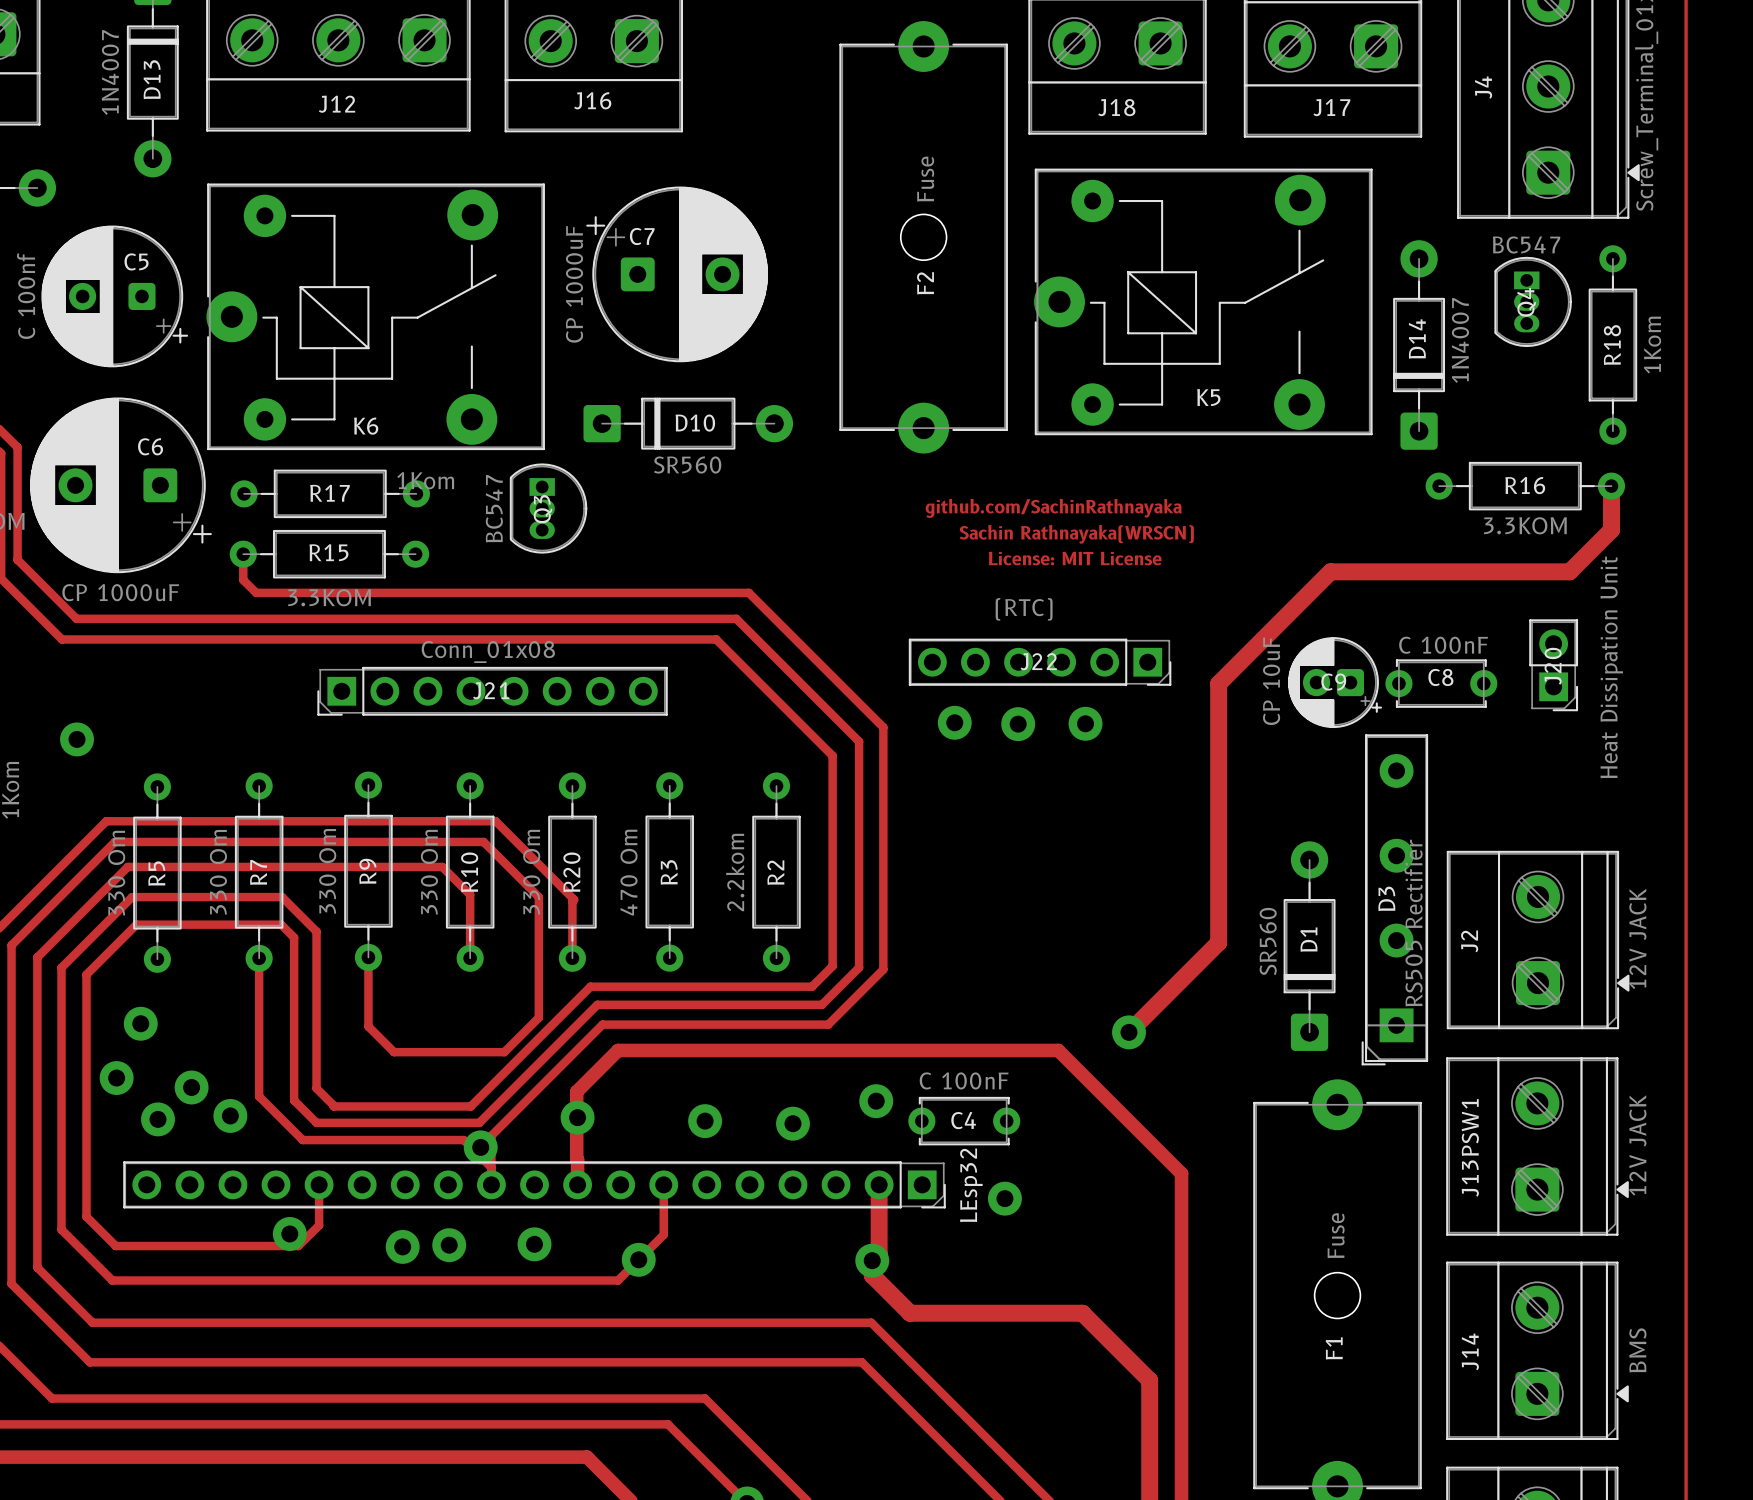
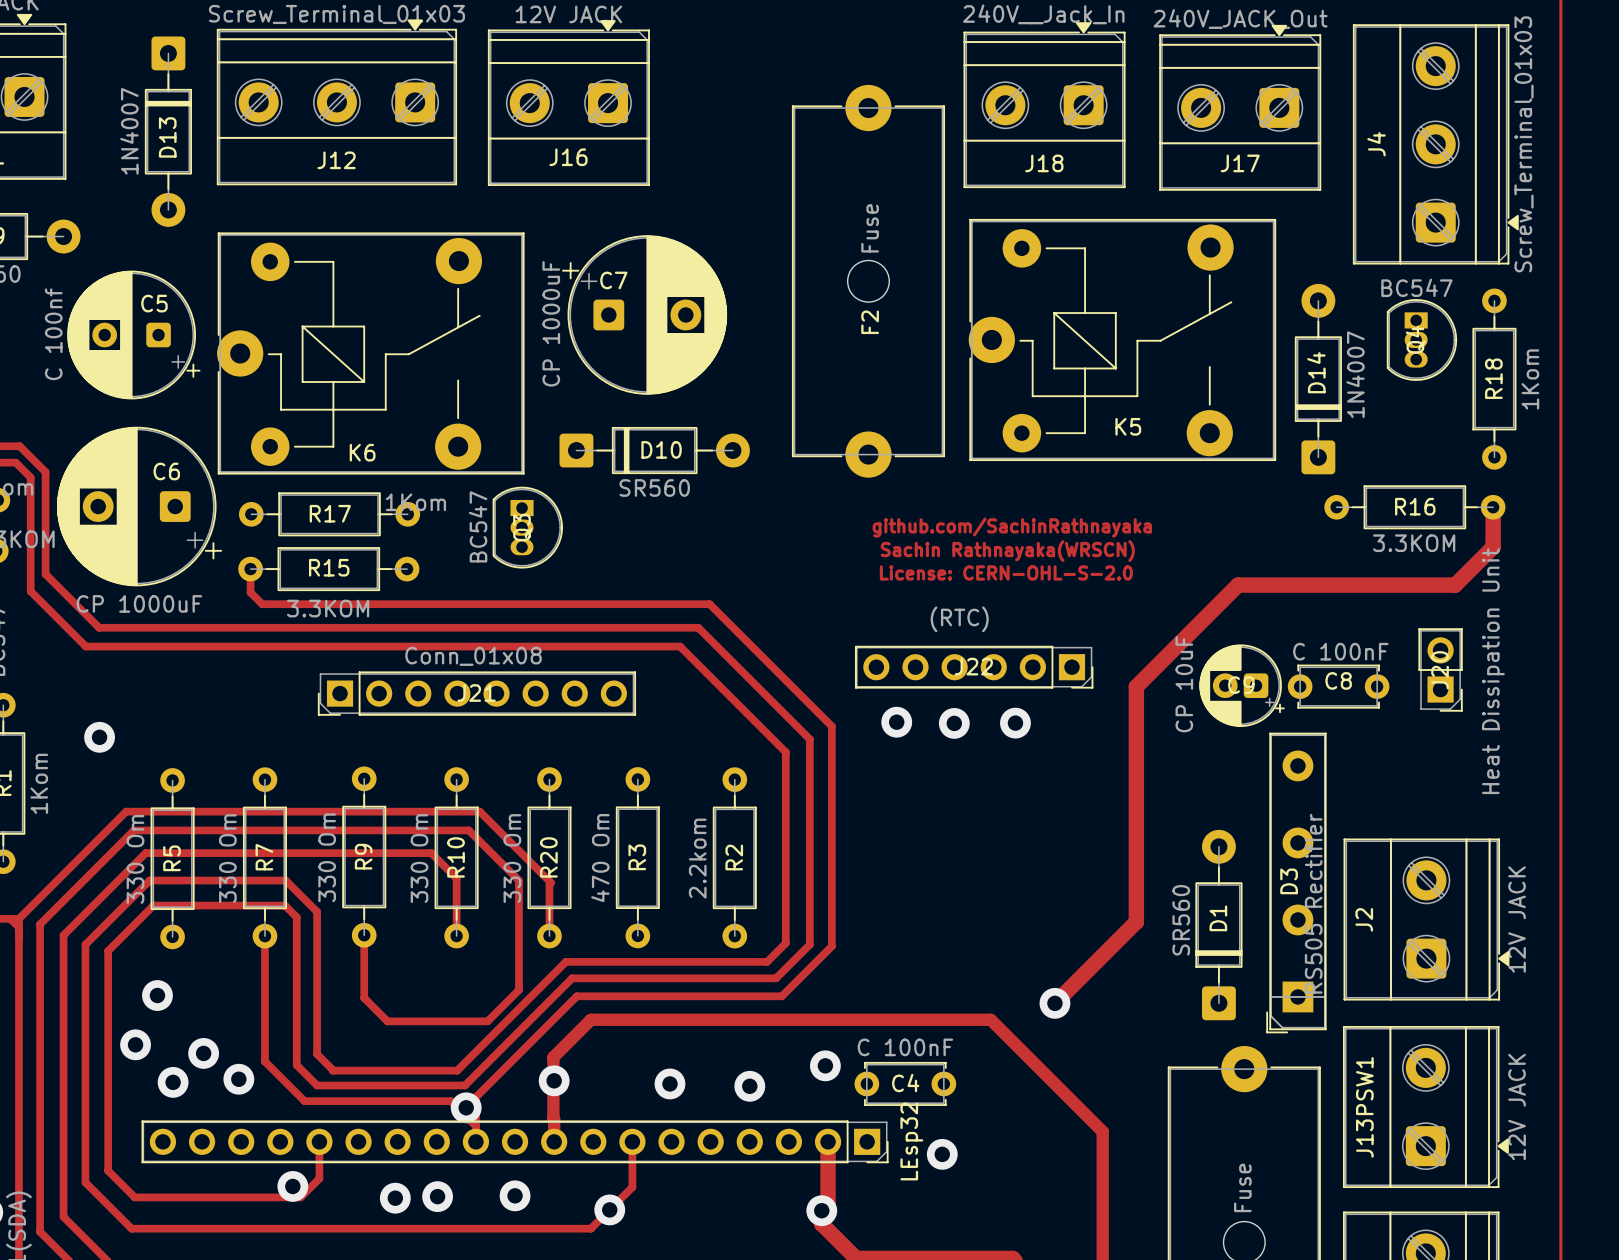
text: License: MIT License (1075, 558) -> License: CERN-OHL-S-2.0 (1006, 572)

